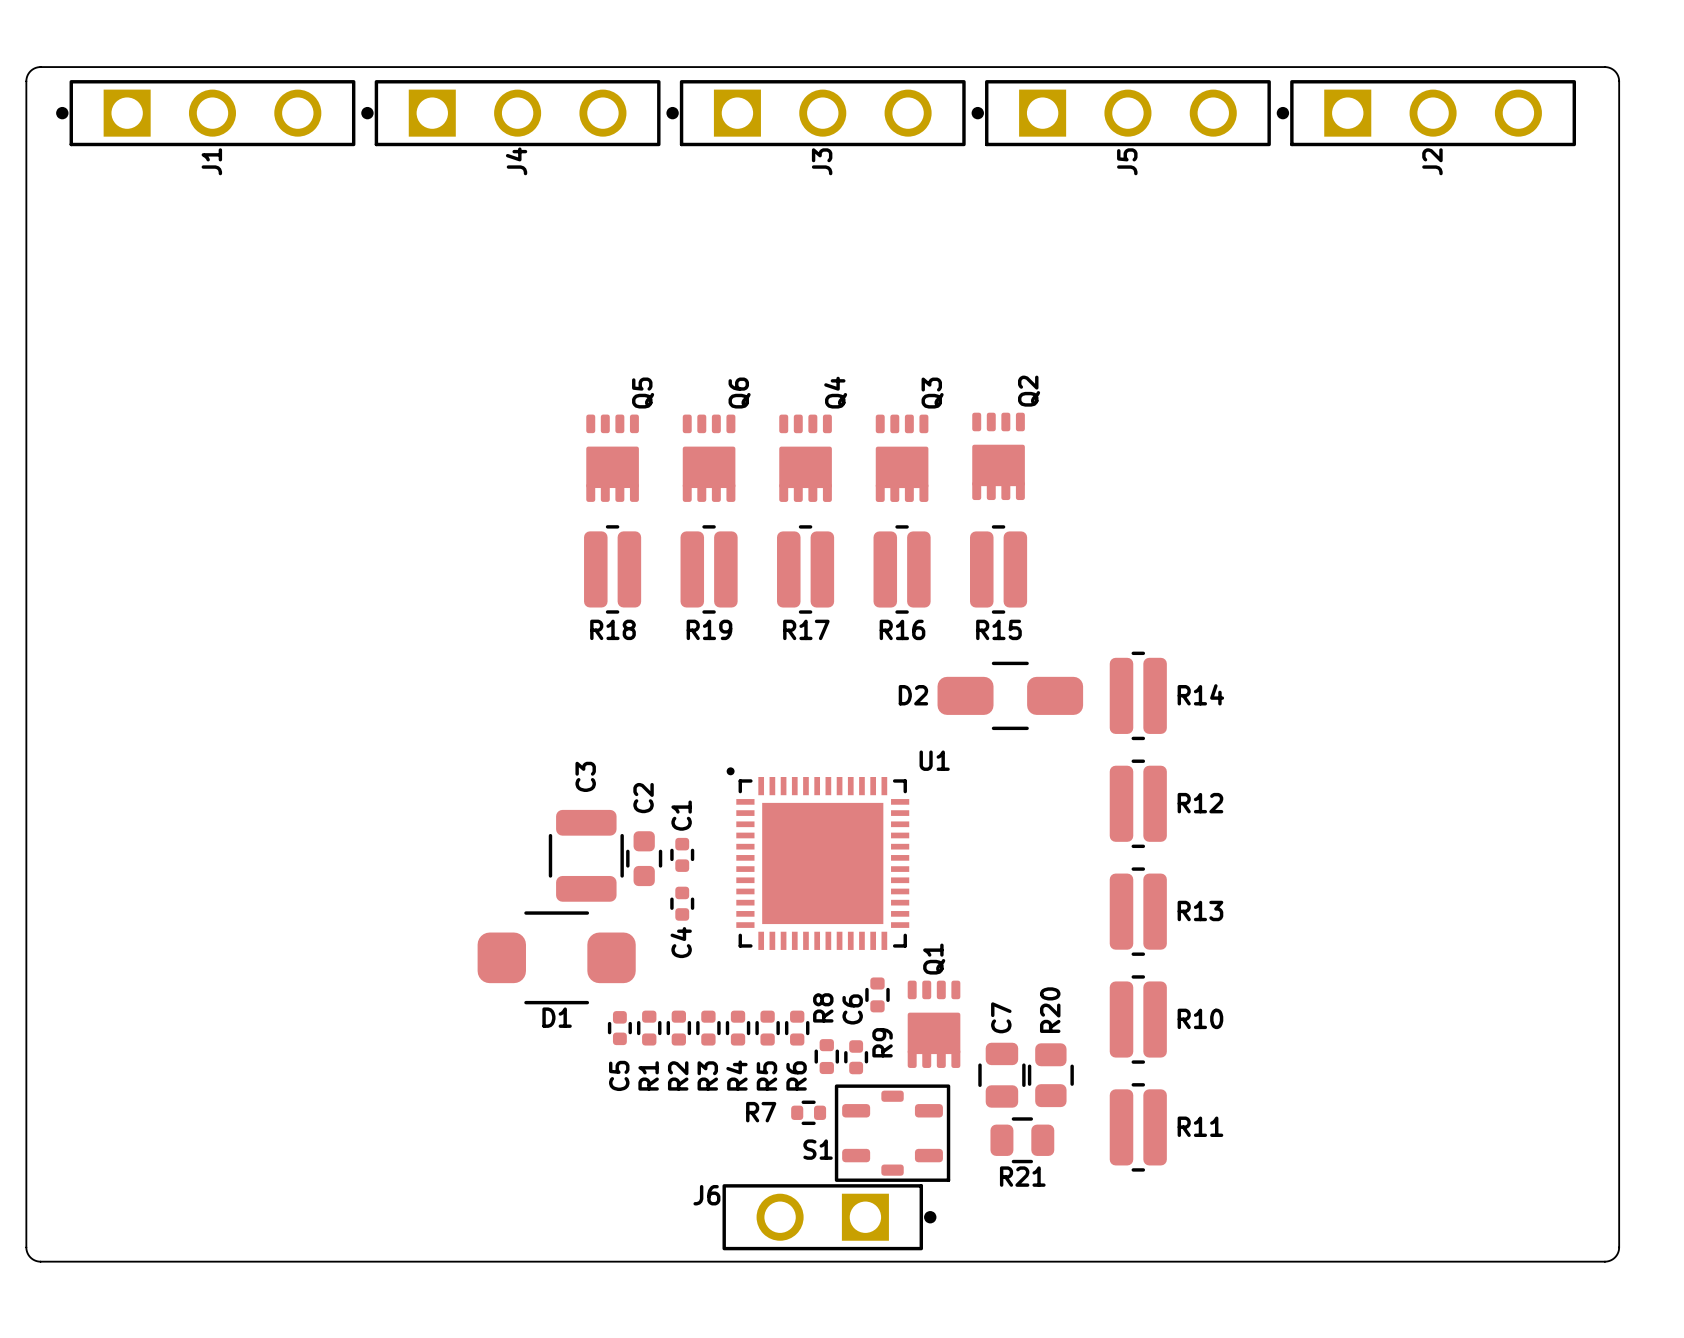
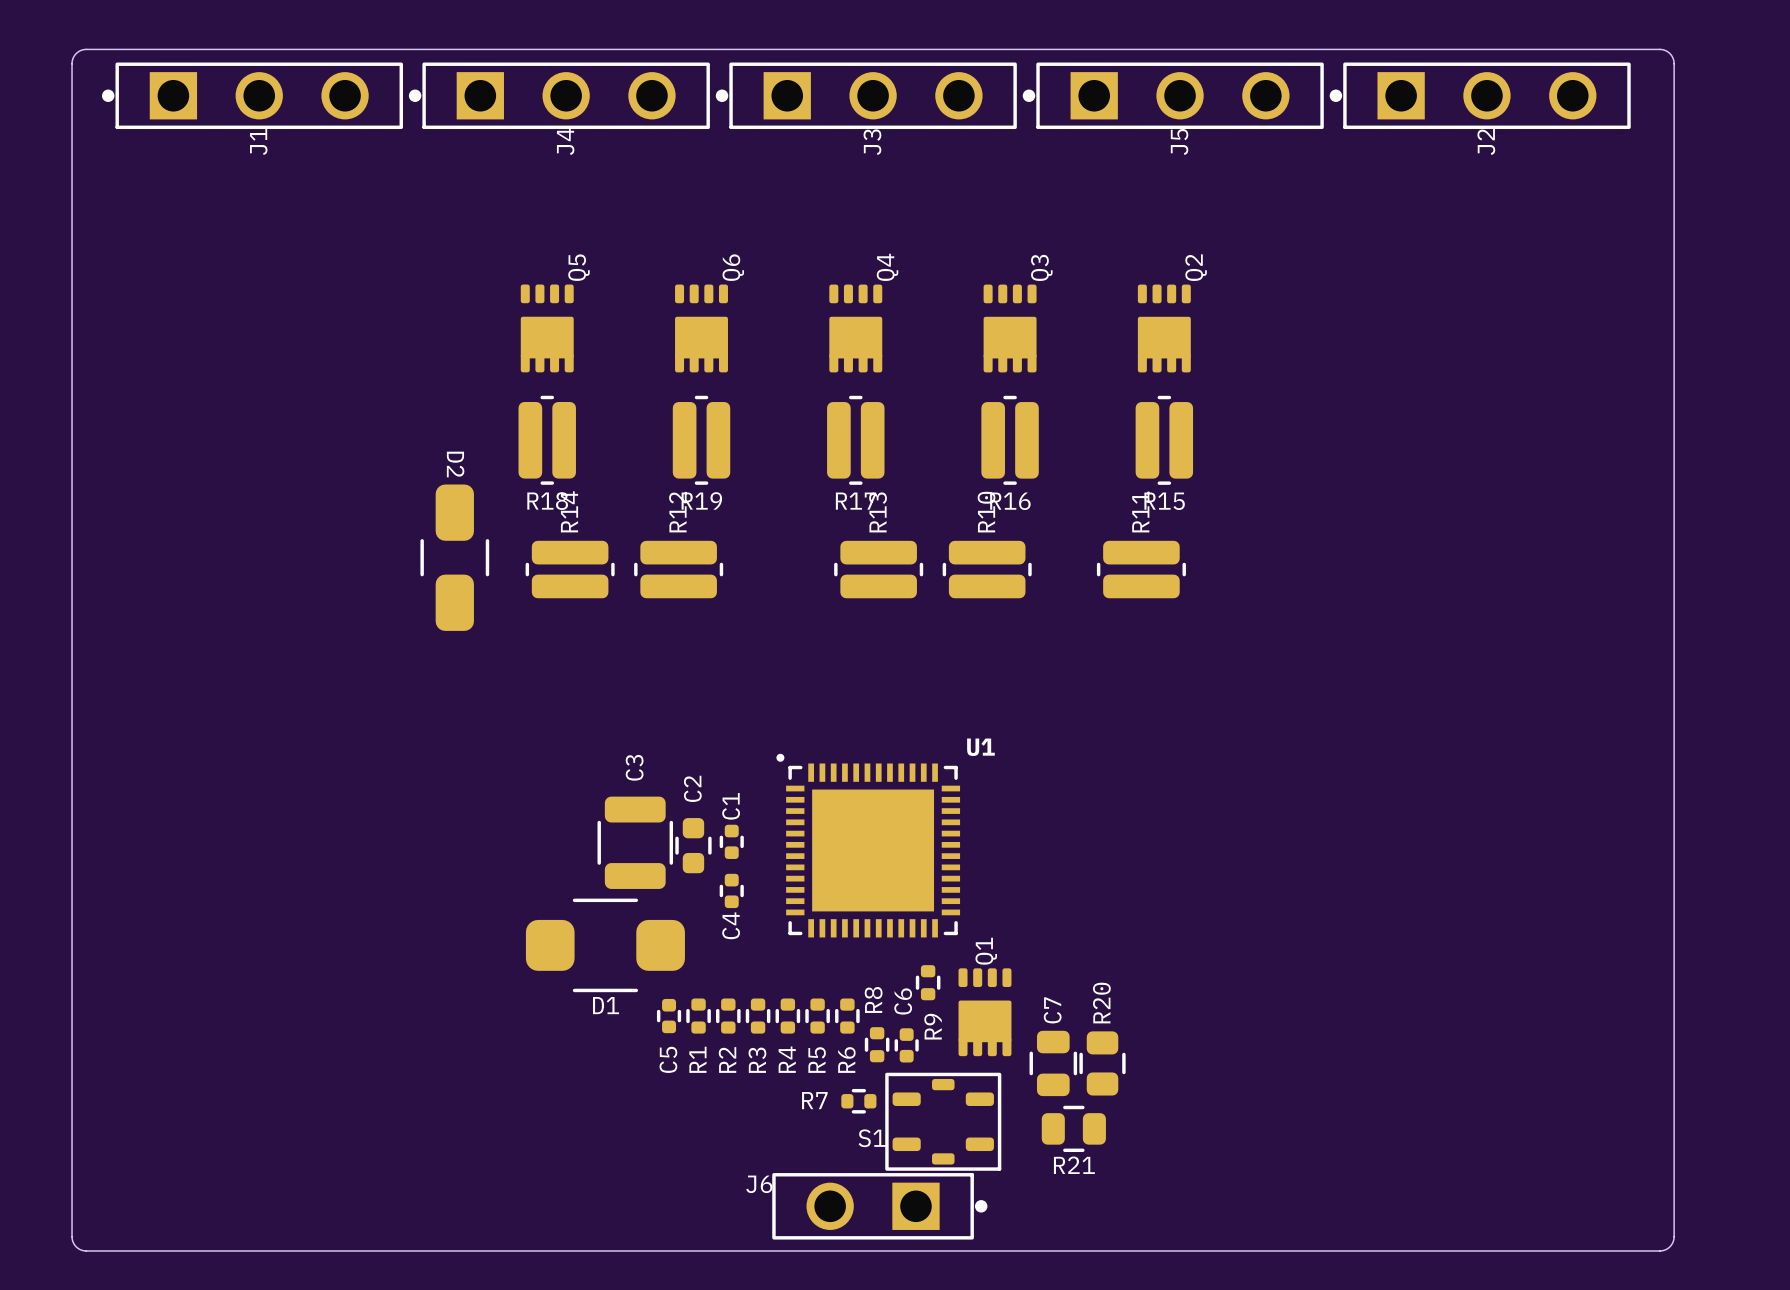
Q2 position: (998, 456) -> (1164, 328)
Q5 position: (612, 458) -> (547, 328)
Q6 position: (709, 458) -> (701, 328)
Q4 position: (805, 458) -> (855, 328)
Q3 position: (902, 458) -> (1010, 328)
R18 position: (612, 569) -> (547, 440)
R19 position: (709, 569) -> (701, 440)
R17 position: (805, 569) -> (855, 440)
R16 position: (902, 569) -> (1010, 440)
R15 position: (998, 569) -> (1164, 440)
R14 name position: R14 (1200, 694) -> R14 (569, 511)
D2 rotation: 0° (1010, 695) -> 90° clockwise (454, 557)
D2 position: (1010, 695) -> (454, 557)
R14 rotation: 0° (1138, 695) -> 90° clockwise (570, 569)
R14 position: (1138, 695) -> (570, 569)
R12 rotation: 0° (1138, 803) -> 90° clockwise (678, 569)
R12 position: (1138, 803) -> (678, 569)
R12 name position: R12 (1200, 803) -> R12 (677, 512)
R13 name position: R13 (1200, 910) -> R13 (878, 512)
R13 rotation: 0° (1138, 911) -> 90° clockwise (878, 569)
R13 position: (1138, 911) -> (878, 569)
R10 name position: R10 (1200, 1018) -> R10 (986, 512)
R10 rotation: 0° (1138, 1019) -> 90° clockwise (987, 569)
R10 position: (1138, 1019) -> (987, 569)
R11 name position: R11 (1200, 1126) -> R11 (1140, 511)
R11 rotation: 0° (1138, 1127) -> 90° clockwise (1141, 569)
R11 position: (1138, 1127) -> (1141, 569)

